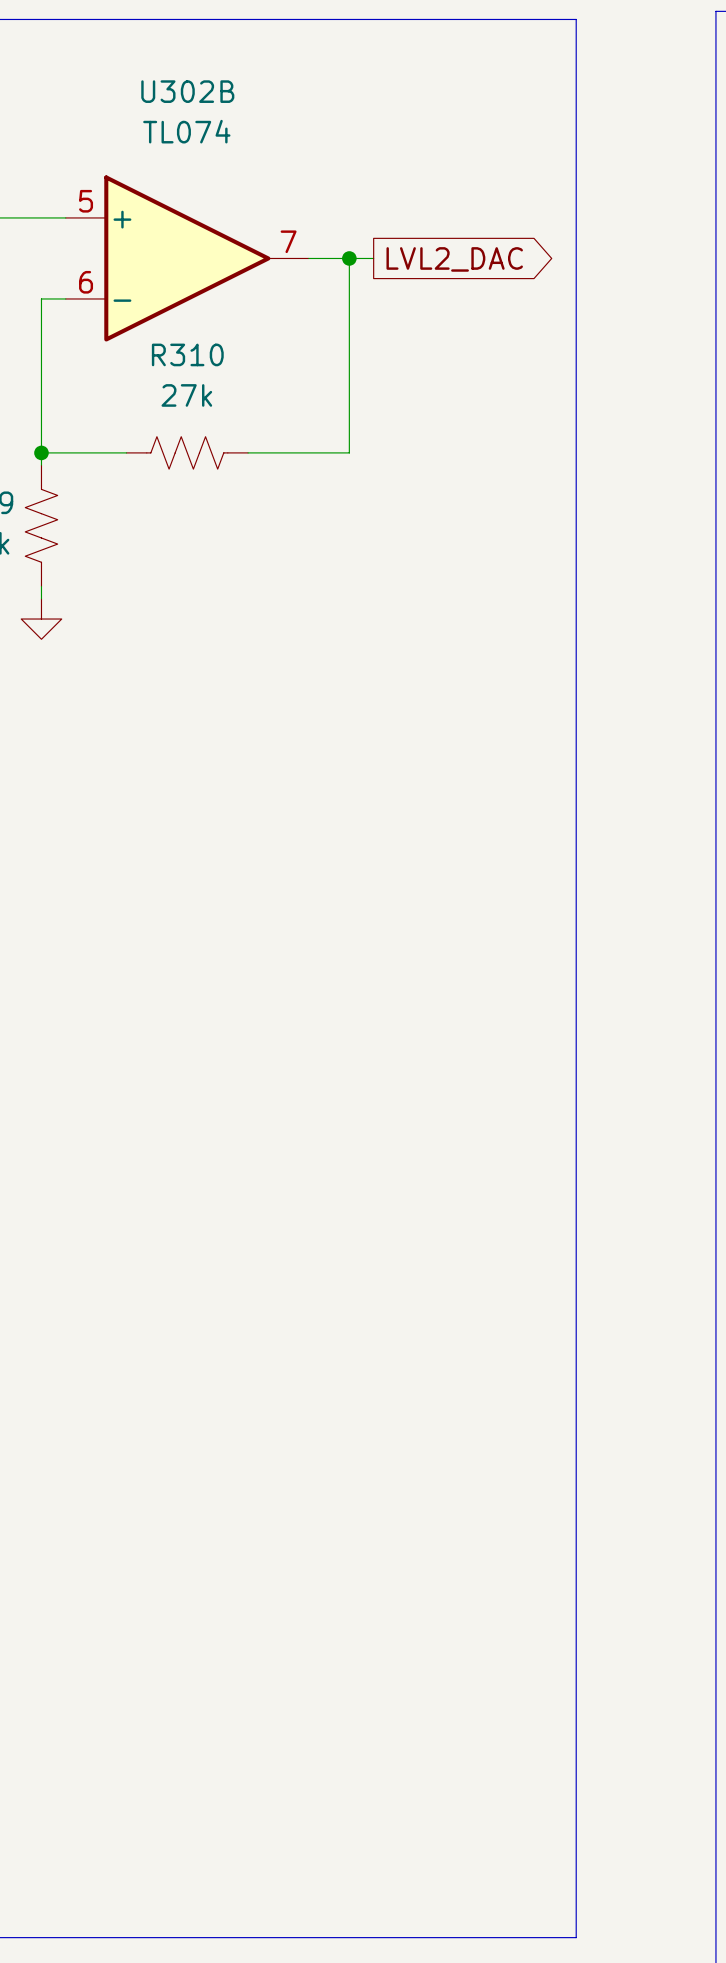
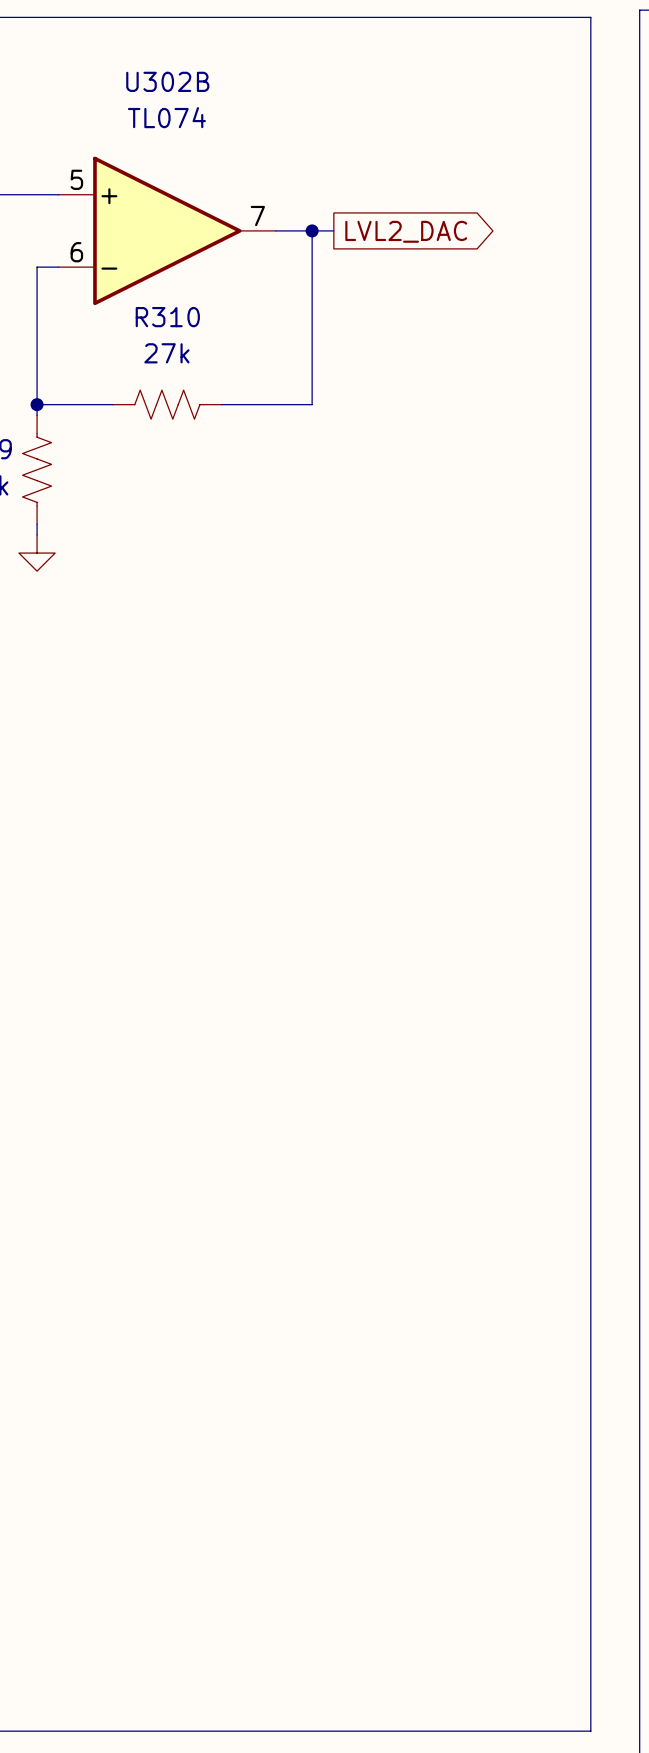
line: (576, 19) (576, 1937) -> (514, 17) (590, 17) (590, 1731) (514, 1731)

